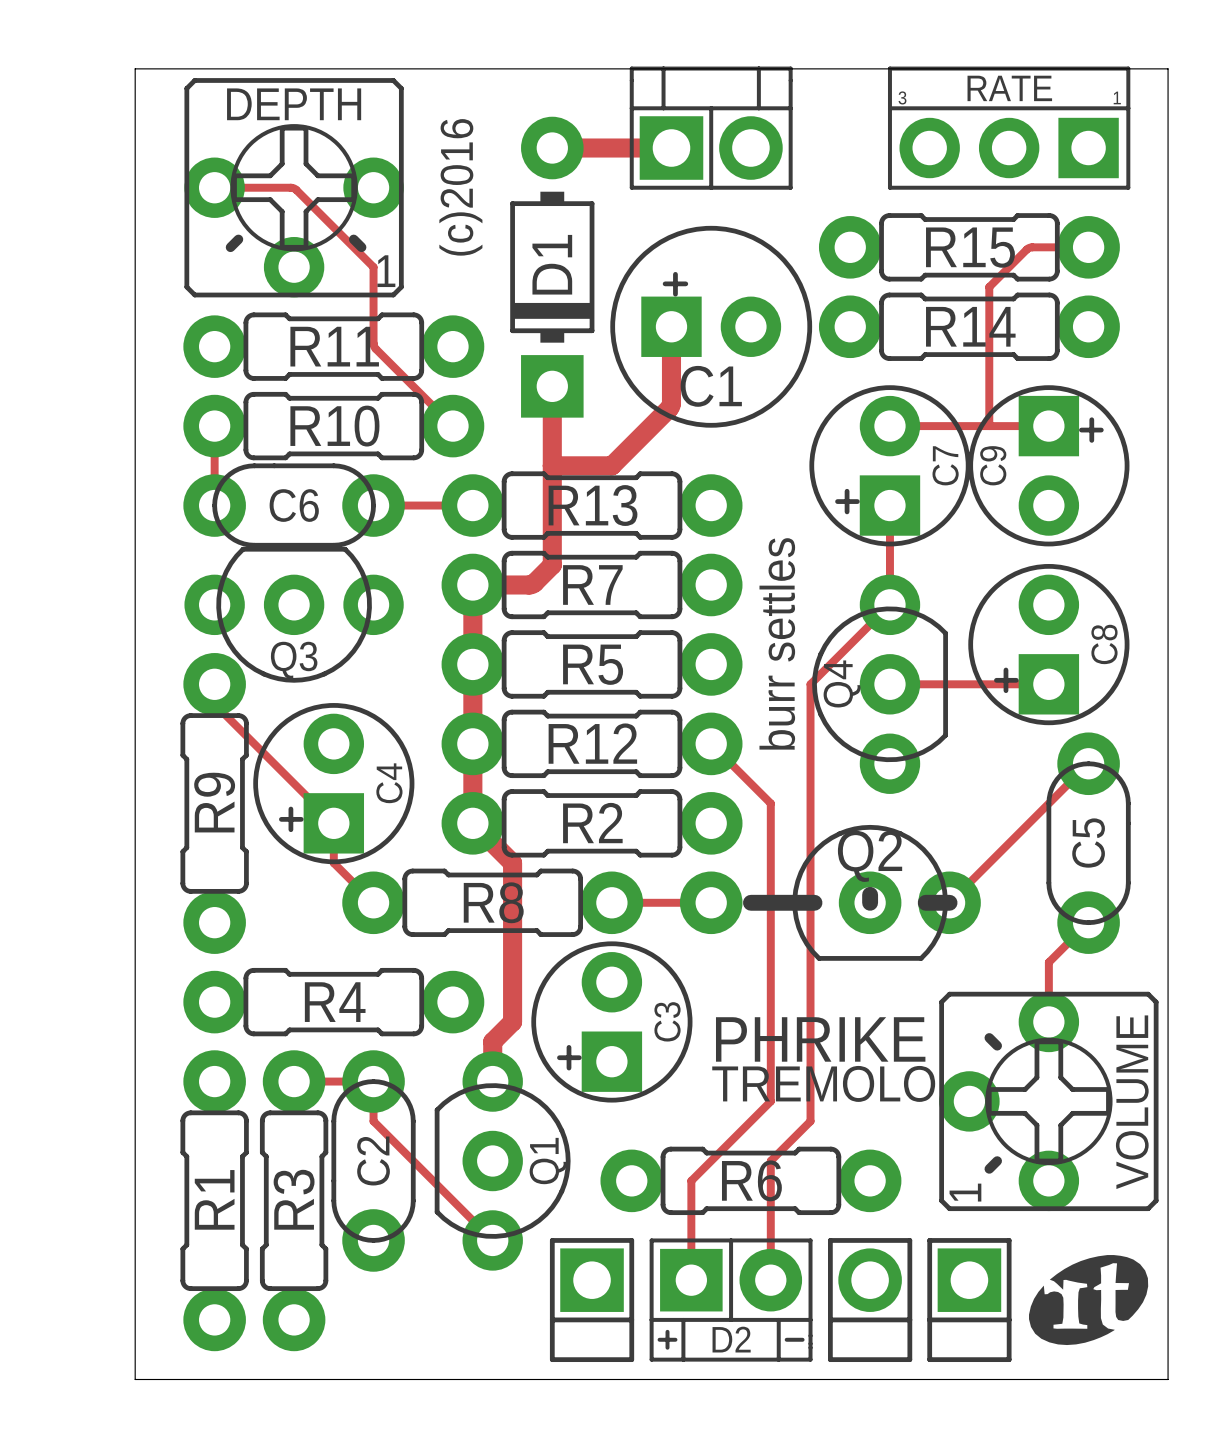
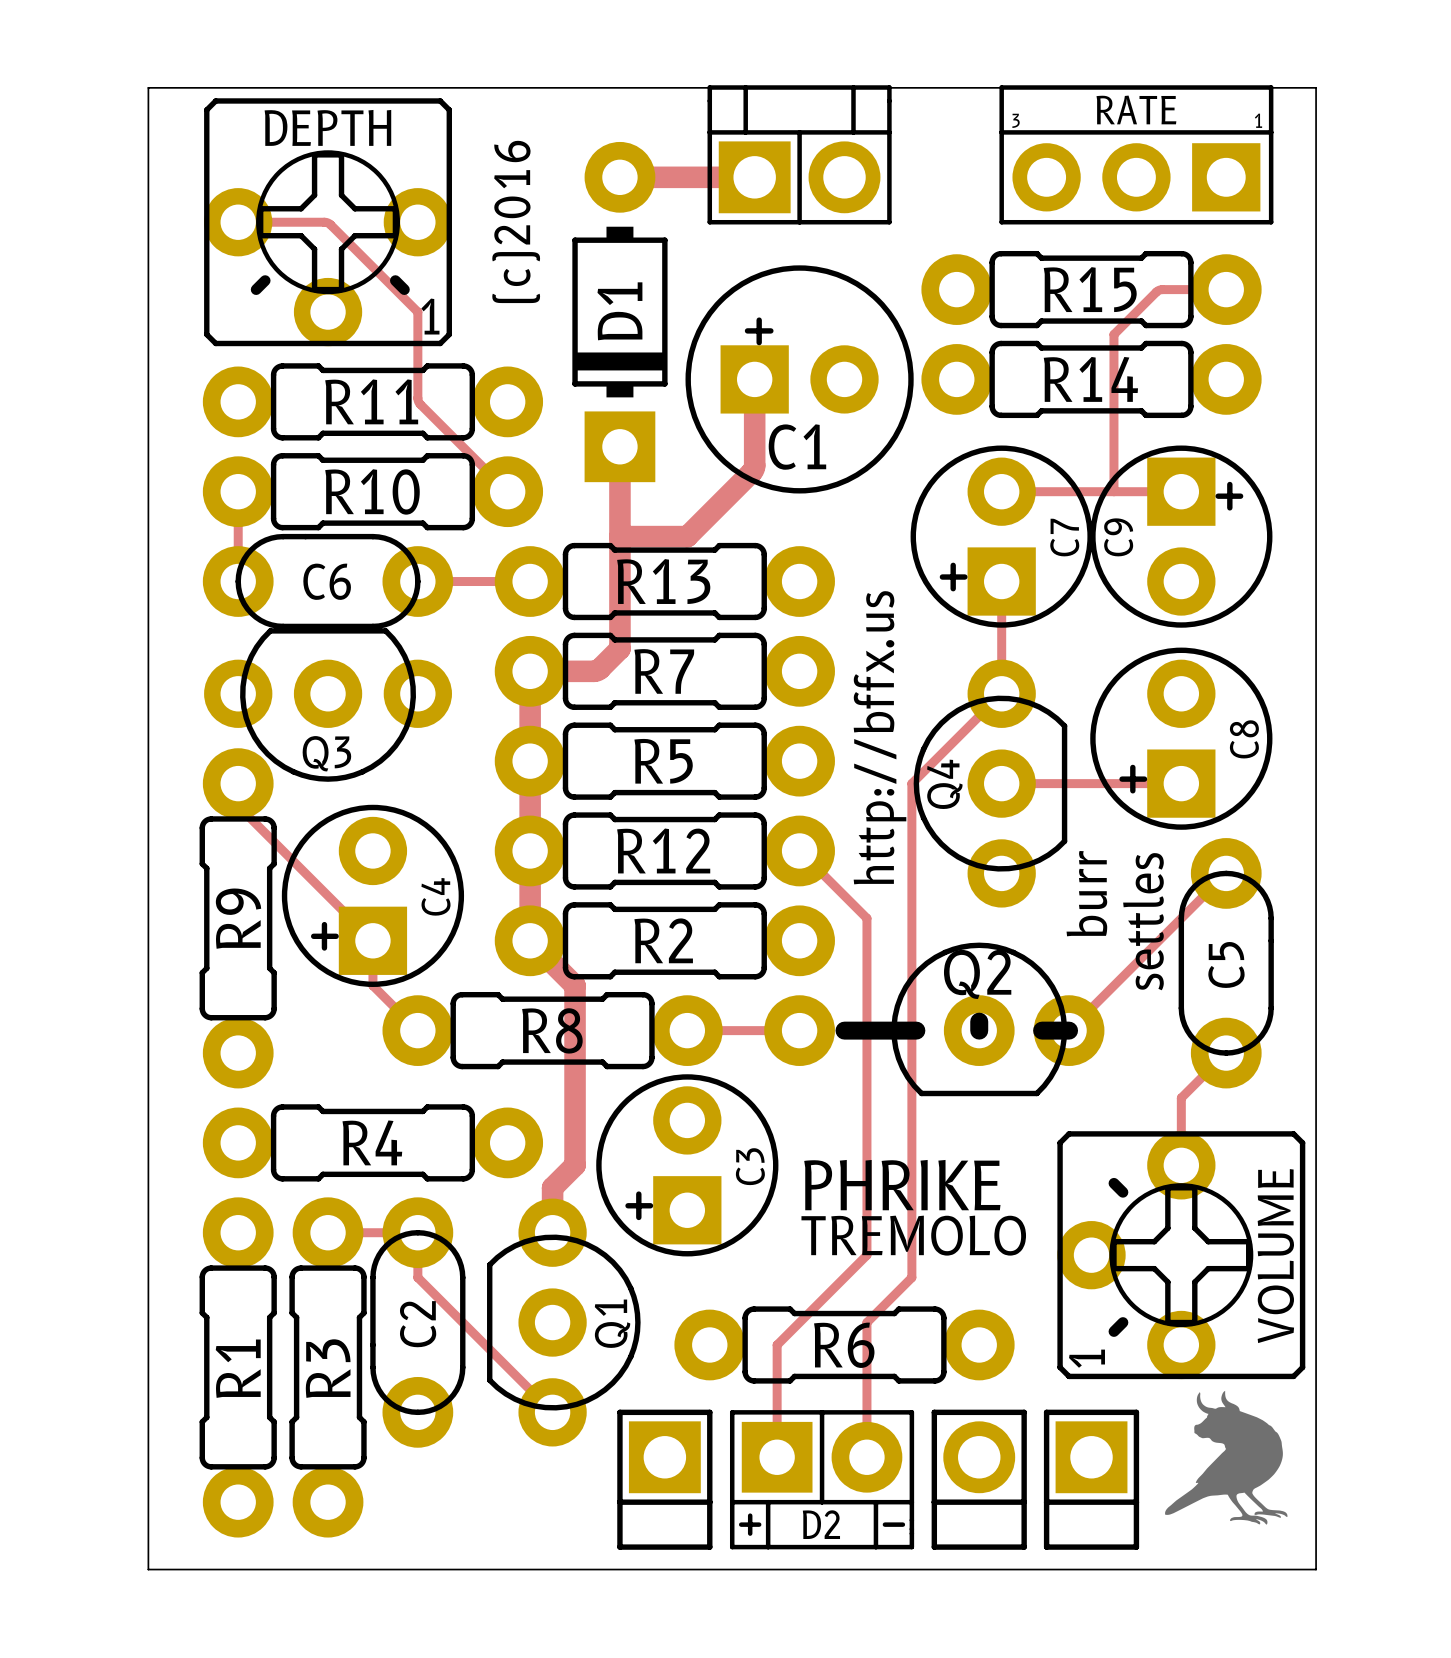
text: burr settles (777, 643) -> http://bffx.us (880, 737)
text: none -> burr (1086, 893)
text: none -> settles (1143, 921)
drawing shape: [1029, 1255, 1149, 1346] -> [1165, 1389, 1288, 1525]

